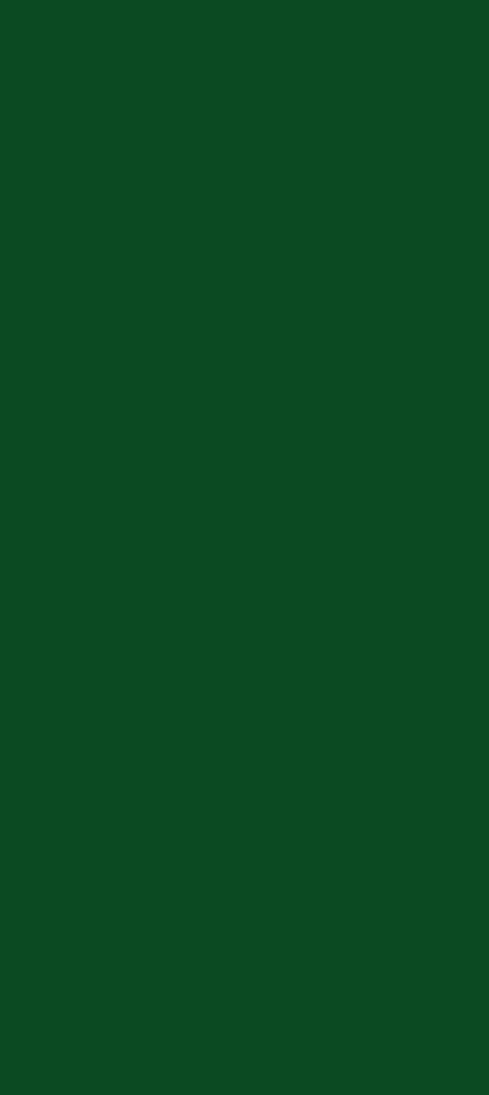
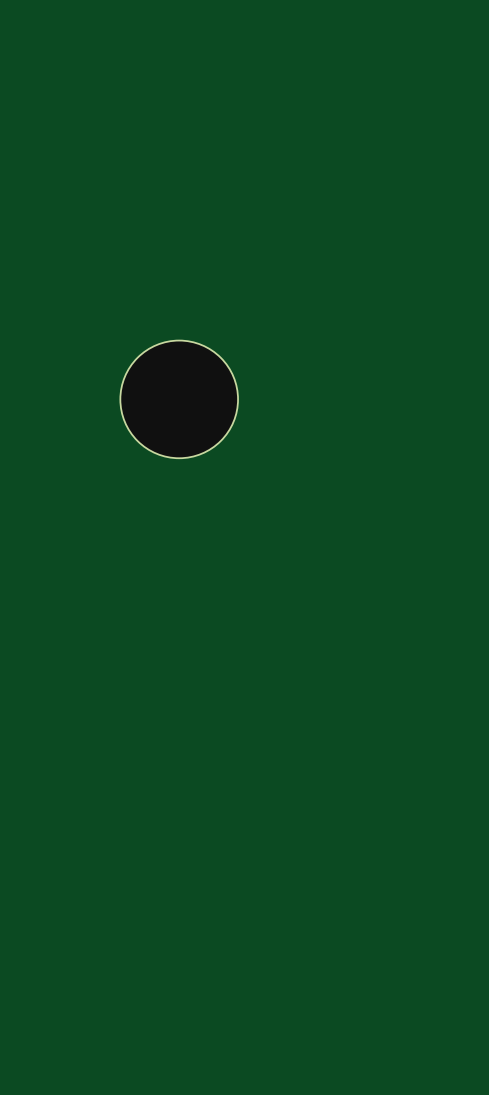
part: none -> (179, 399)

